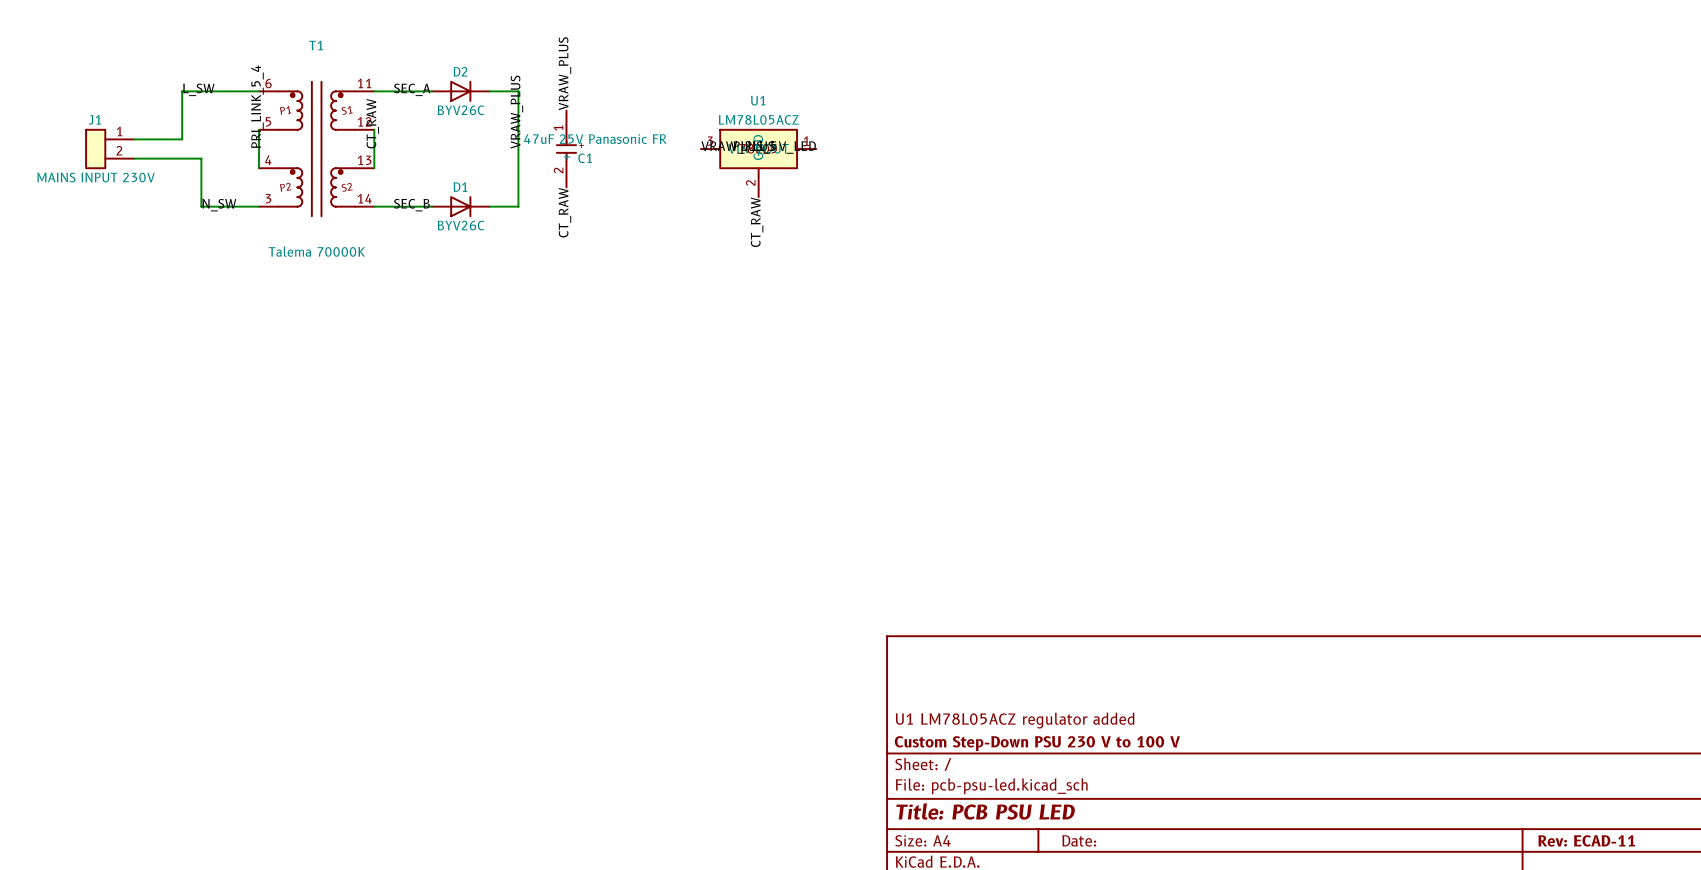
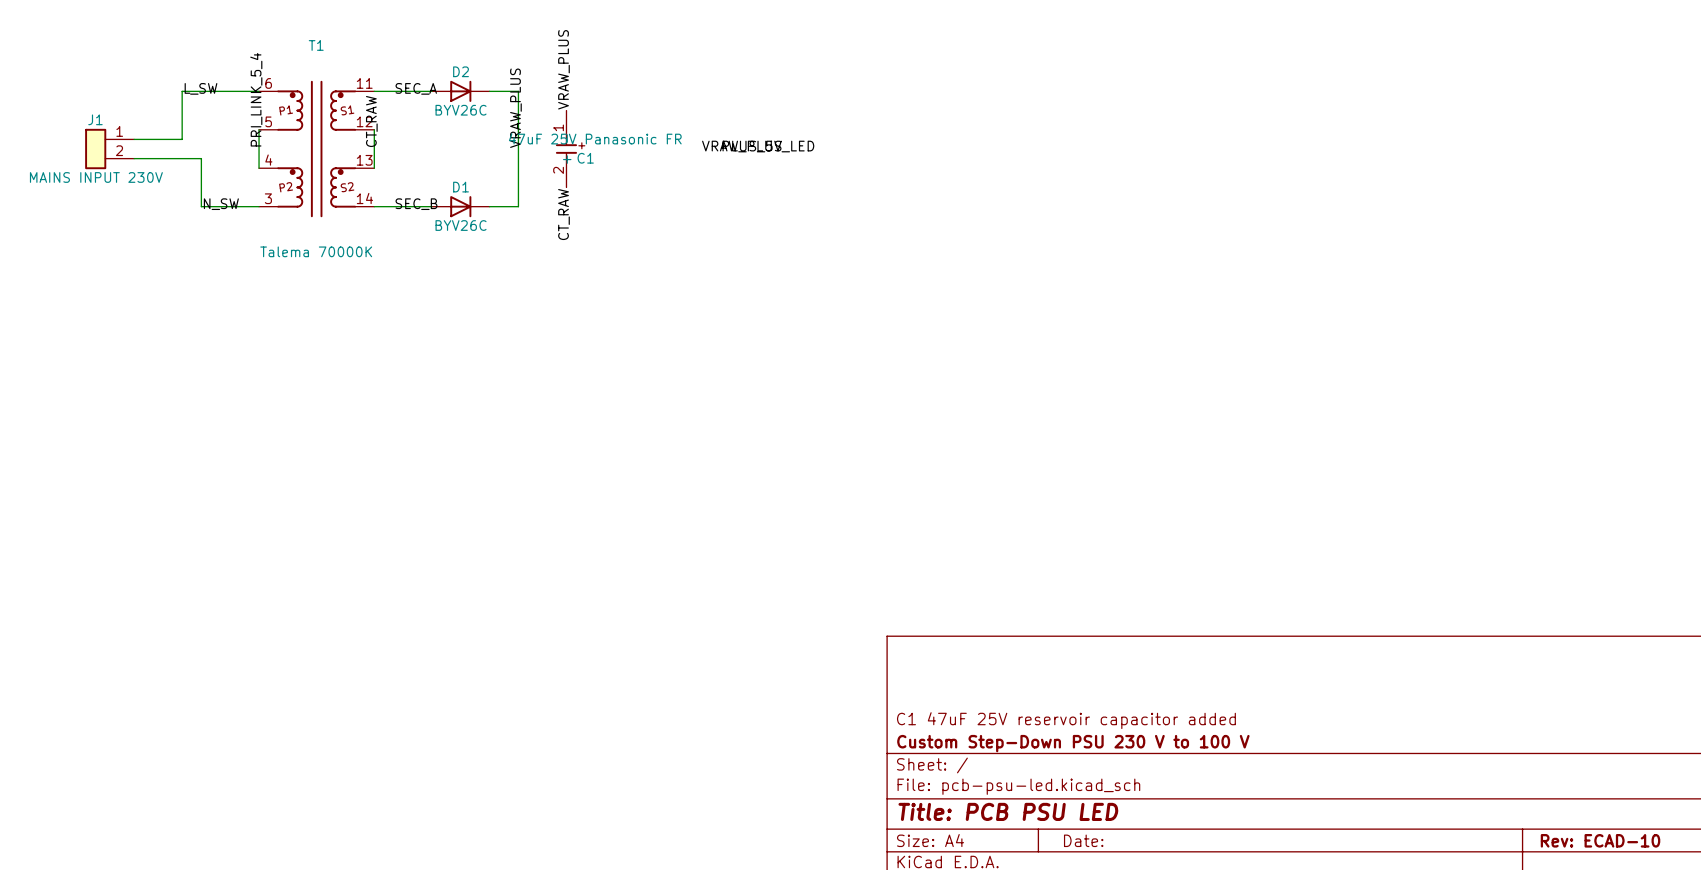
U1: LM78L05ACZ (758, 162) -> none
label: CT_RAW (757, 222) -> none
title block: U1 LM78L05ACZ regulator added (1015, 720) -> C1 47uF 25V reservoir capacitor added (1066, 720)
title block: Rev: ECAD-11 (1586, 840) -> Rev: ECAD-10 (1600, 840)

